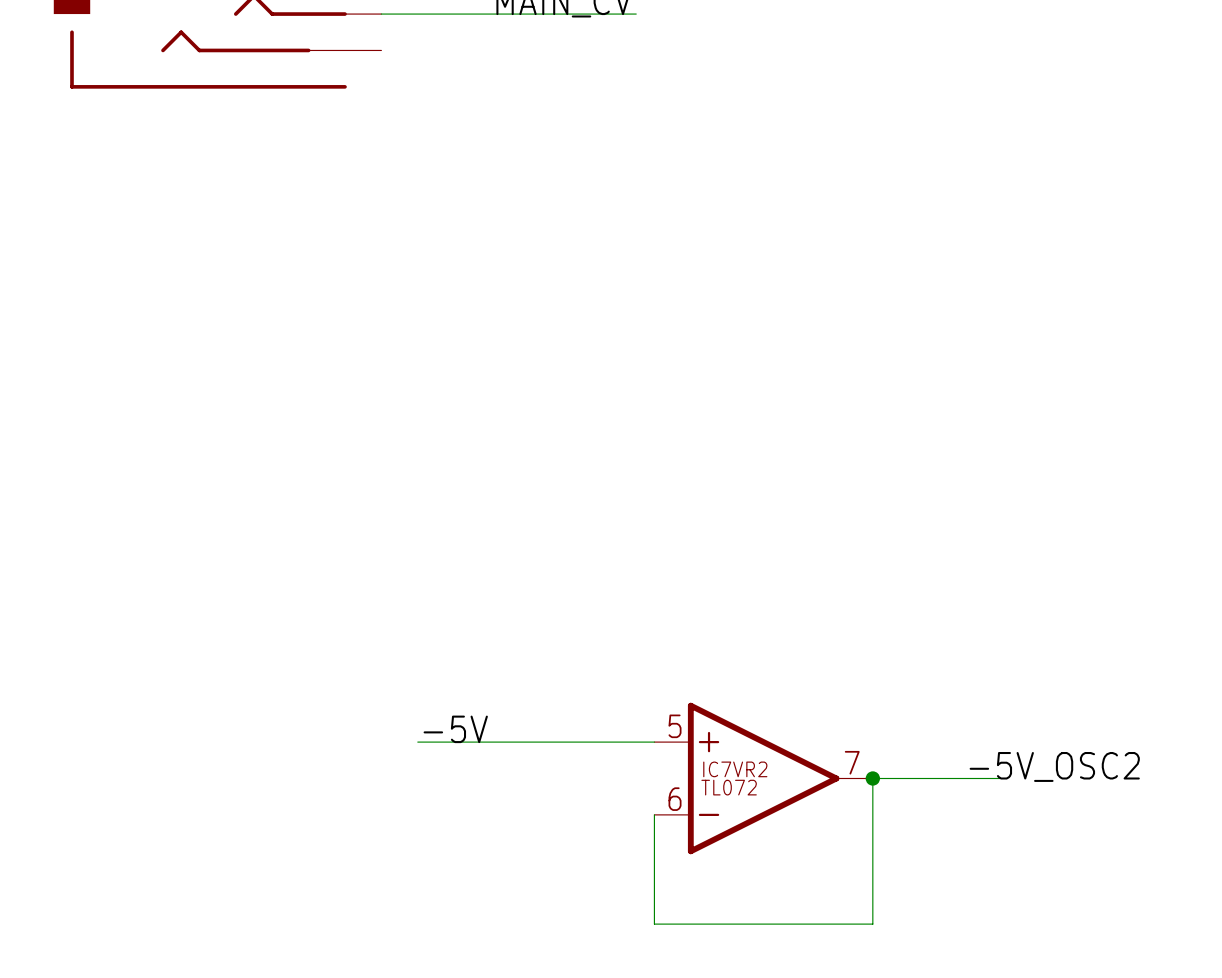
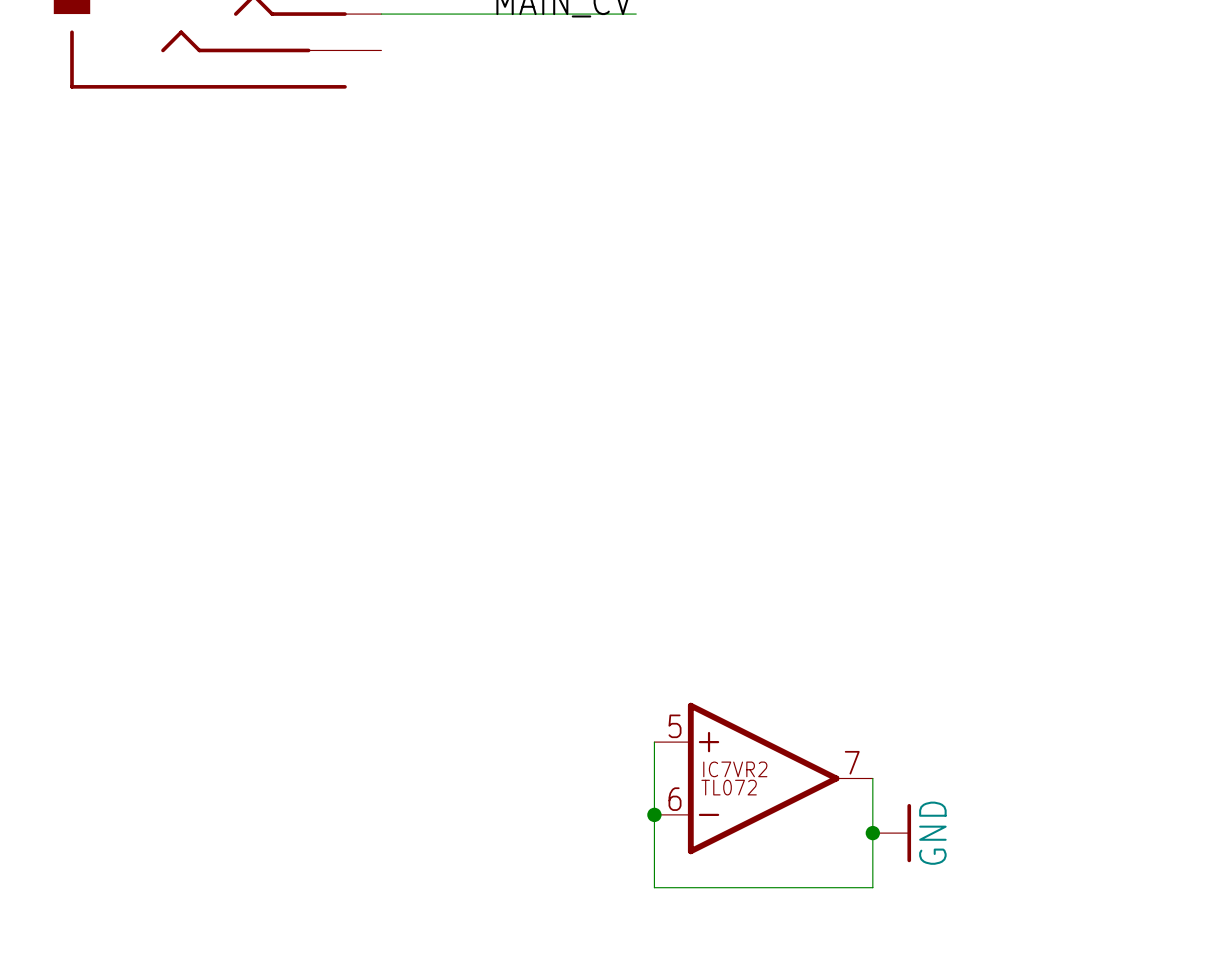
label: -5V (455, 729) -> none
wire: (417, 742) (654, 742) -> (654, 814) (654, 742)
label: -5V_OSC2 (1054, 766) -> none
wire: (872, 778) (1000, 778) -> none
junction position: (872, 778) -> (872, 833)
junction: none -> (654, 814)
power symbol: none -> GND (891, 833)
wire: (654, 887) (654, 924) (872, 924) (872, 887) -> (654, 887) (872, 887)

